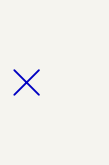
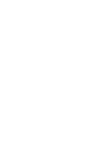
no-connect mark: (26, 82) -> none

